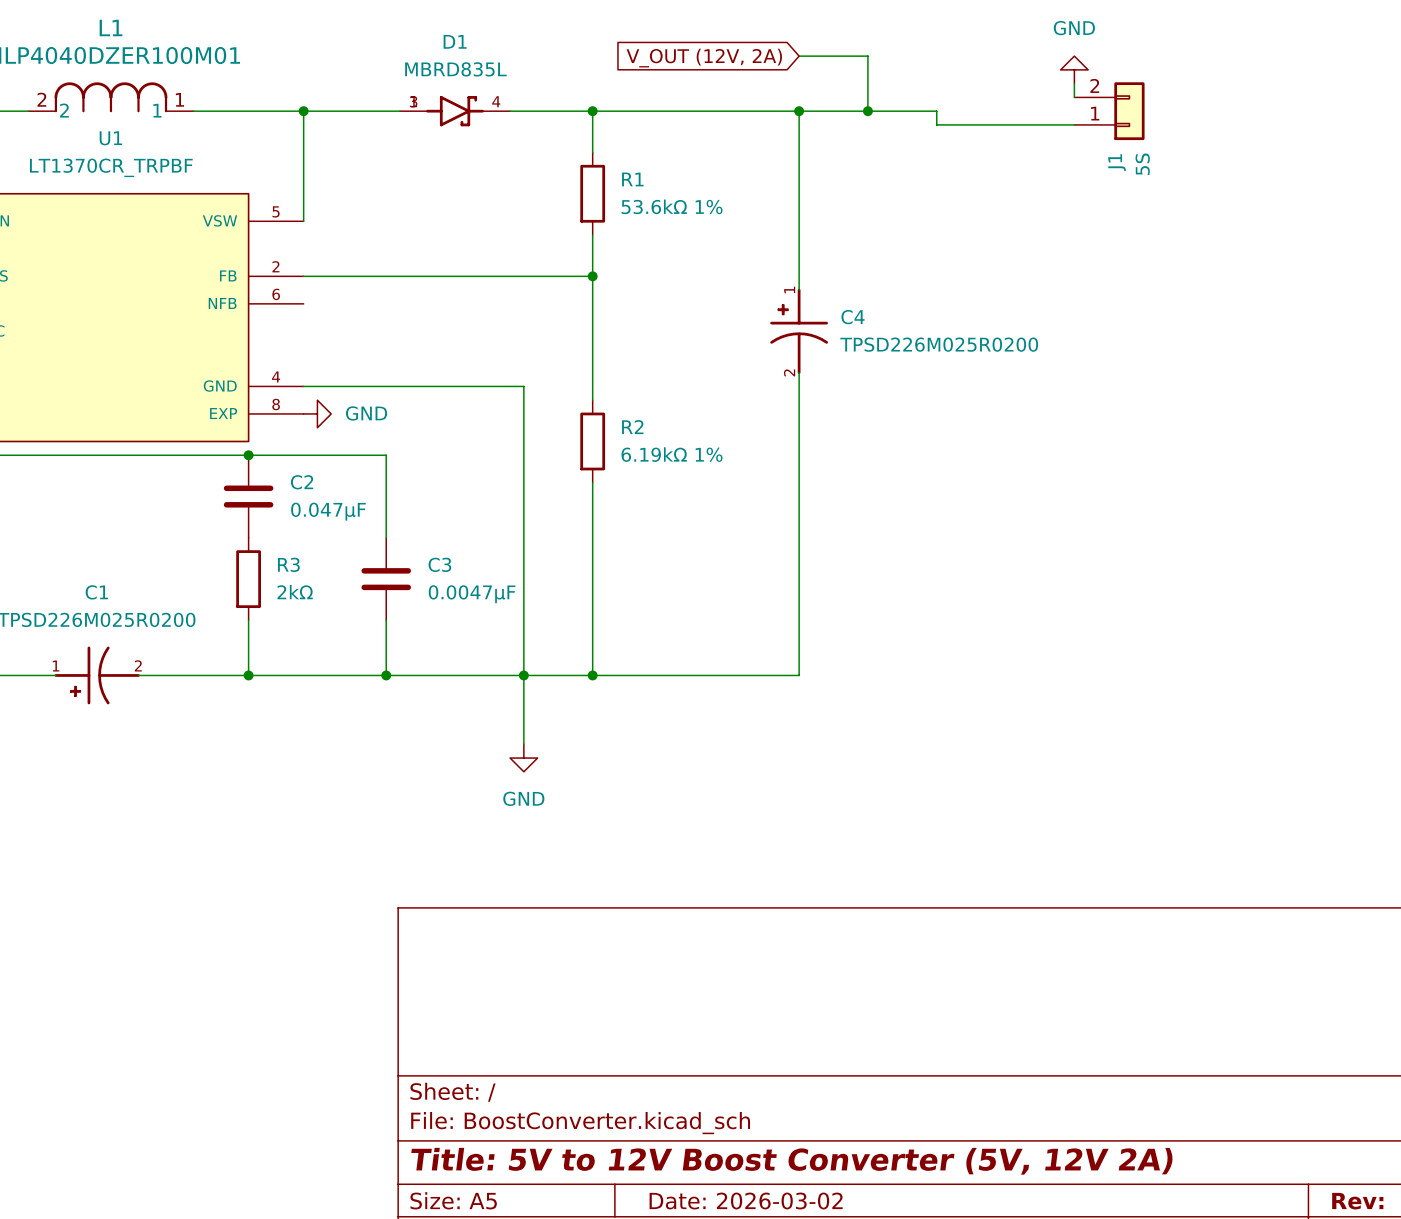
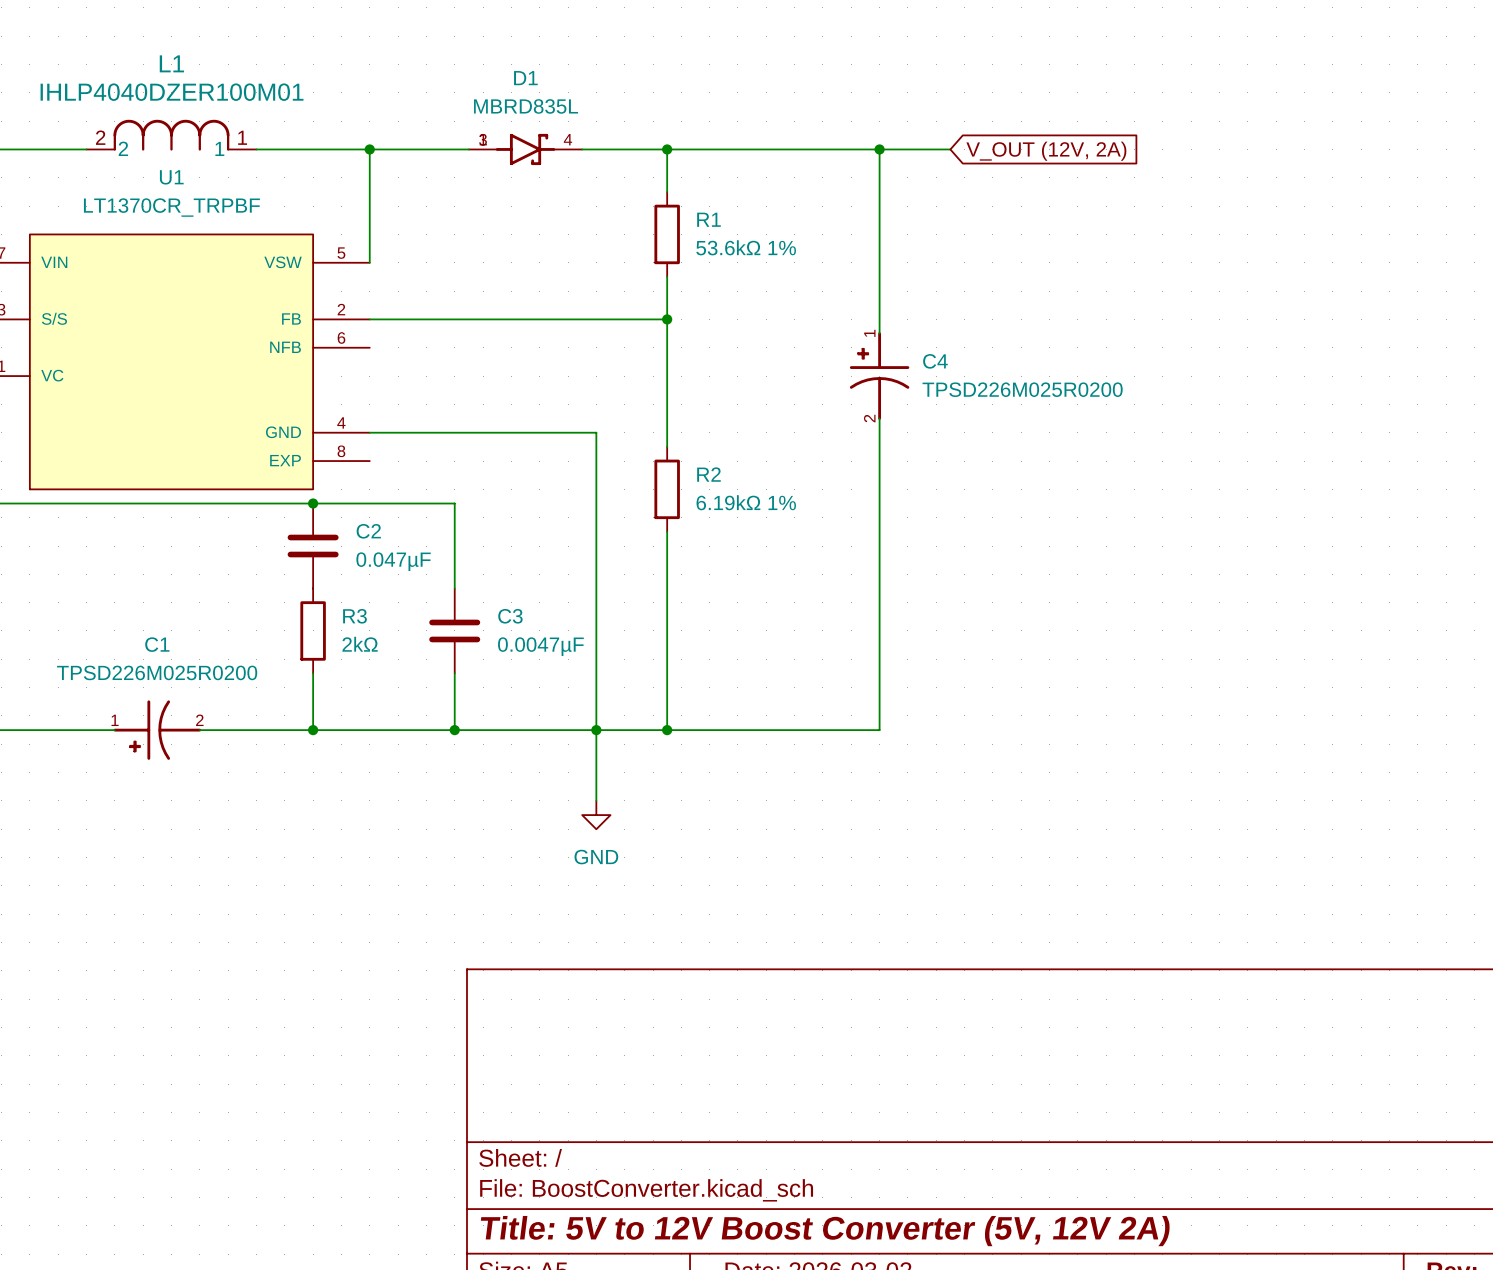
wire: (799, 56) (867, 56) (867, 111) (936, 111) (936, 124) (1074, 124) -> none
global label rotation: 0° (704, 58) -> 180° (1046, 151)
global label position: V_OUT (12V, 2A) (704, 58) -> V_OUT (12V, 2A) (1046, 151)
power symbol: GND (1074, 69) -> none
wire: (1074, 83) (1074, 97) -> none
junction: (867, 111) -> none
J1: 5S (1109, 111) -> none
power symbol: GND (317, 413) -> none

